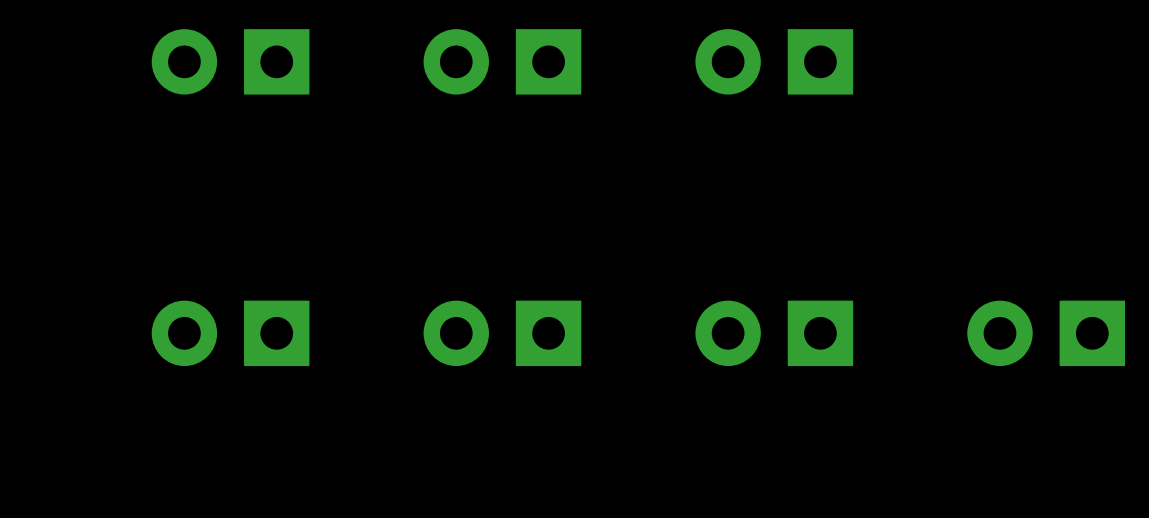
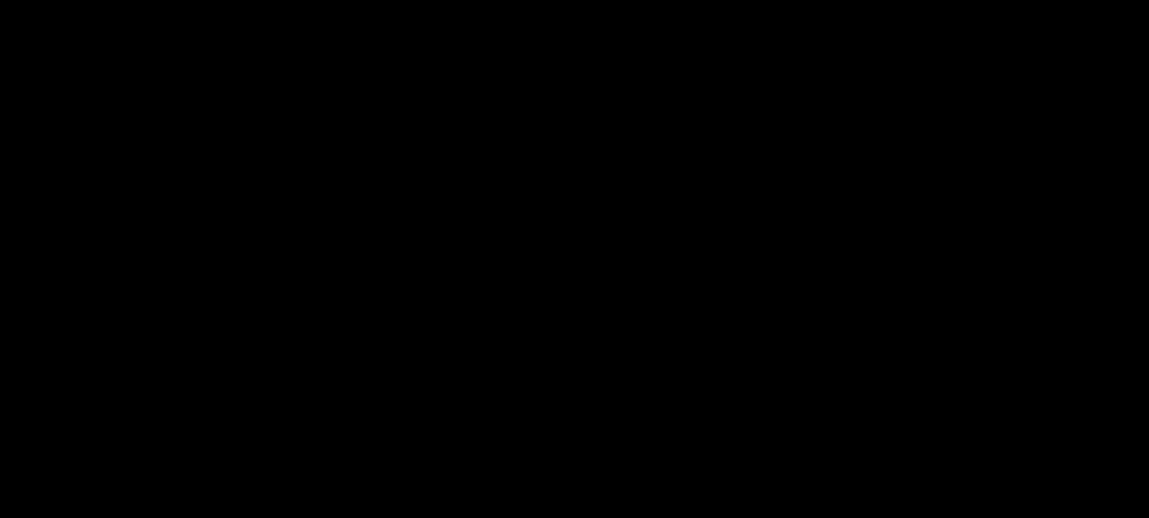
part: (230, 61) -> none
part: (502, 61) -> none
part: (774, 61) -> none
part: (230, 333) -> none
part: (502, 333) -> none
part: (774, 333) -> none
part: (1046, 333) -> none

